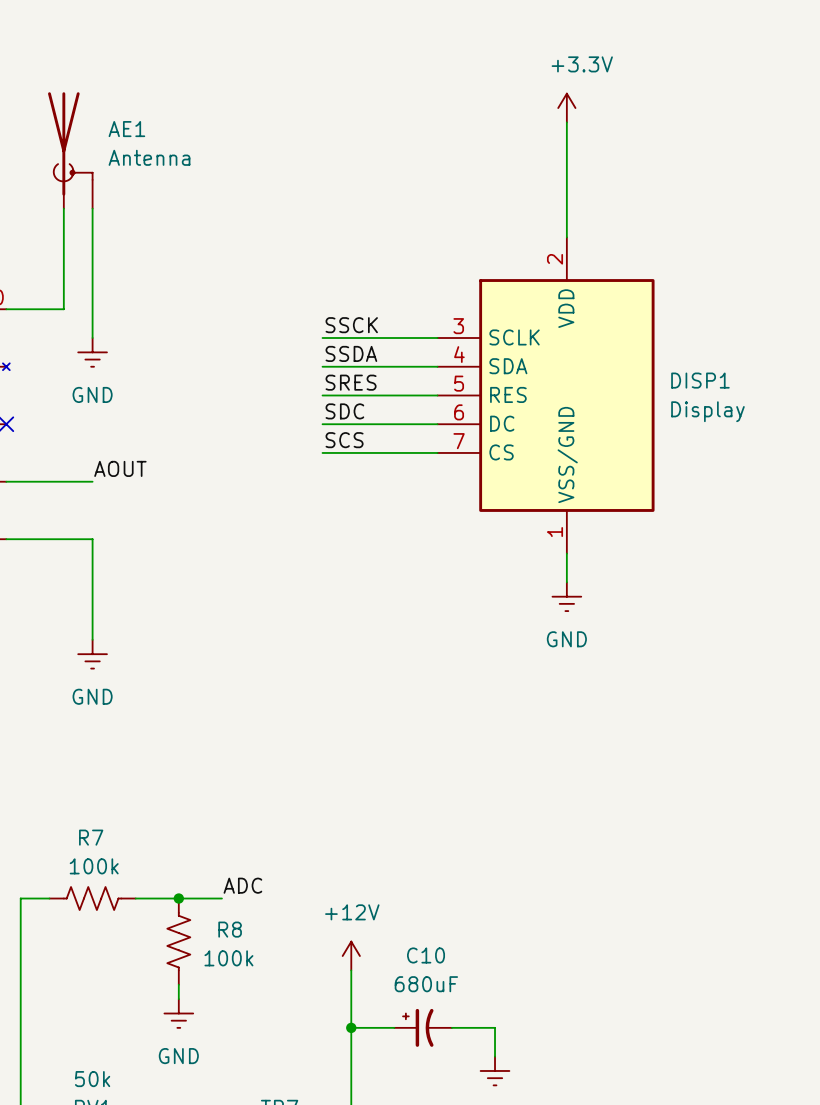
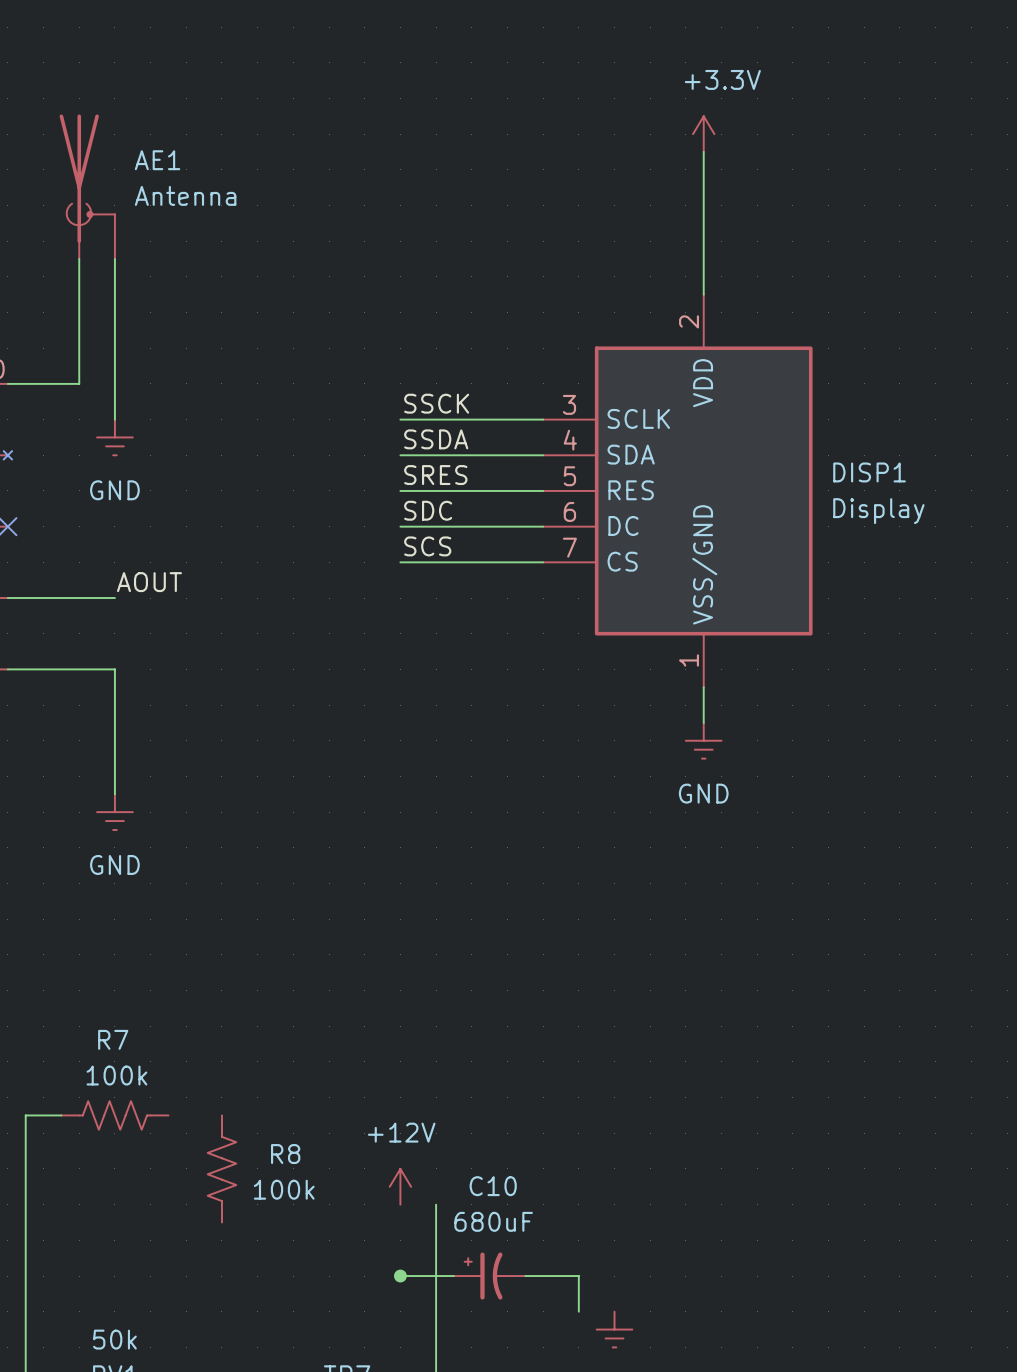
label: ADC (242, 885) -> none
wire: (135, 898) (221, 898) -> none
junction: (178, 898) -> none
power symbol position: +12V (351, 956) -> +12V (400, 1186)
wire: (178, 984) (178, 999) -> none
power symbol: GND (178, 1013) -> none
wire: none -> (400, 1276) (436, 1276)
junction position: (351, 1027) -> (400, 1276)
C10 position: (423, 1027) -> (489, 1276)
wire: (466, 1027) (495, 1027) (495, 1056) -> (578, 1276) (578, 1311)

